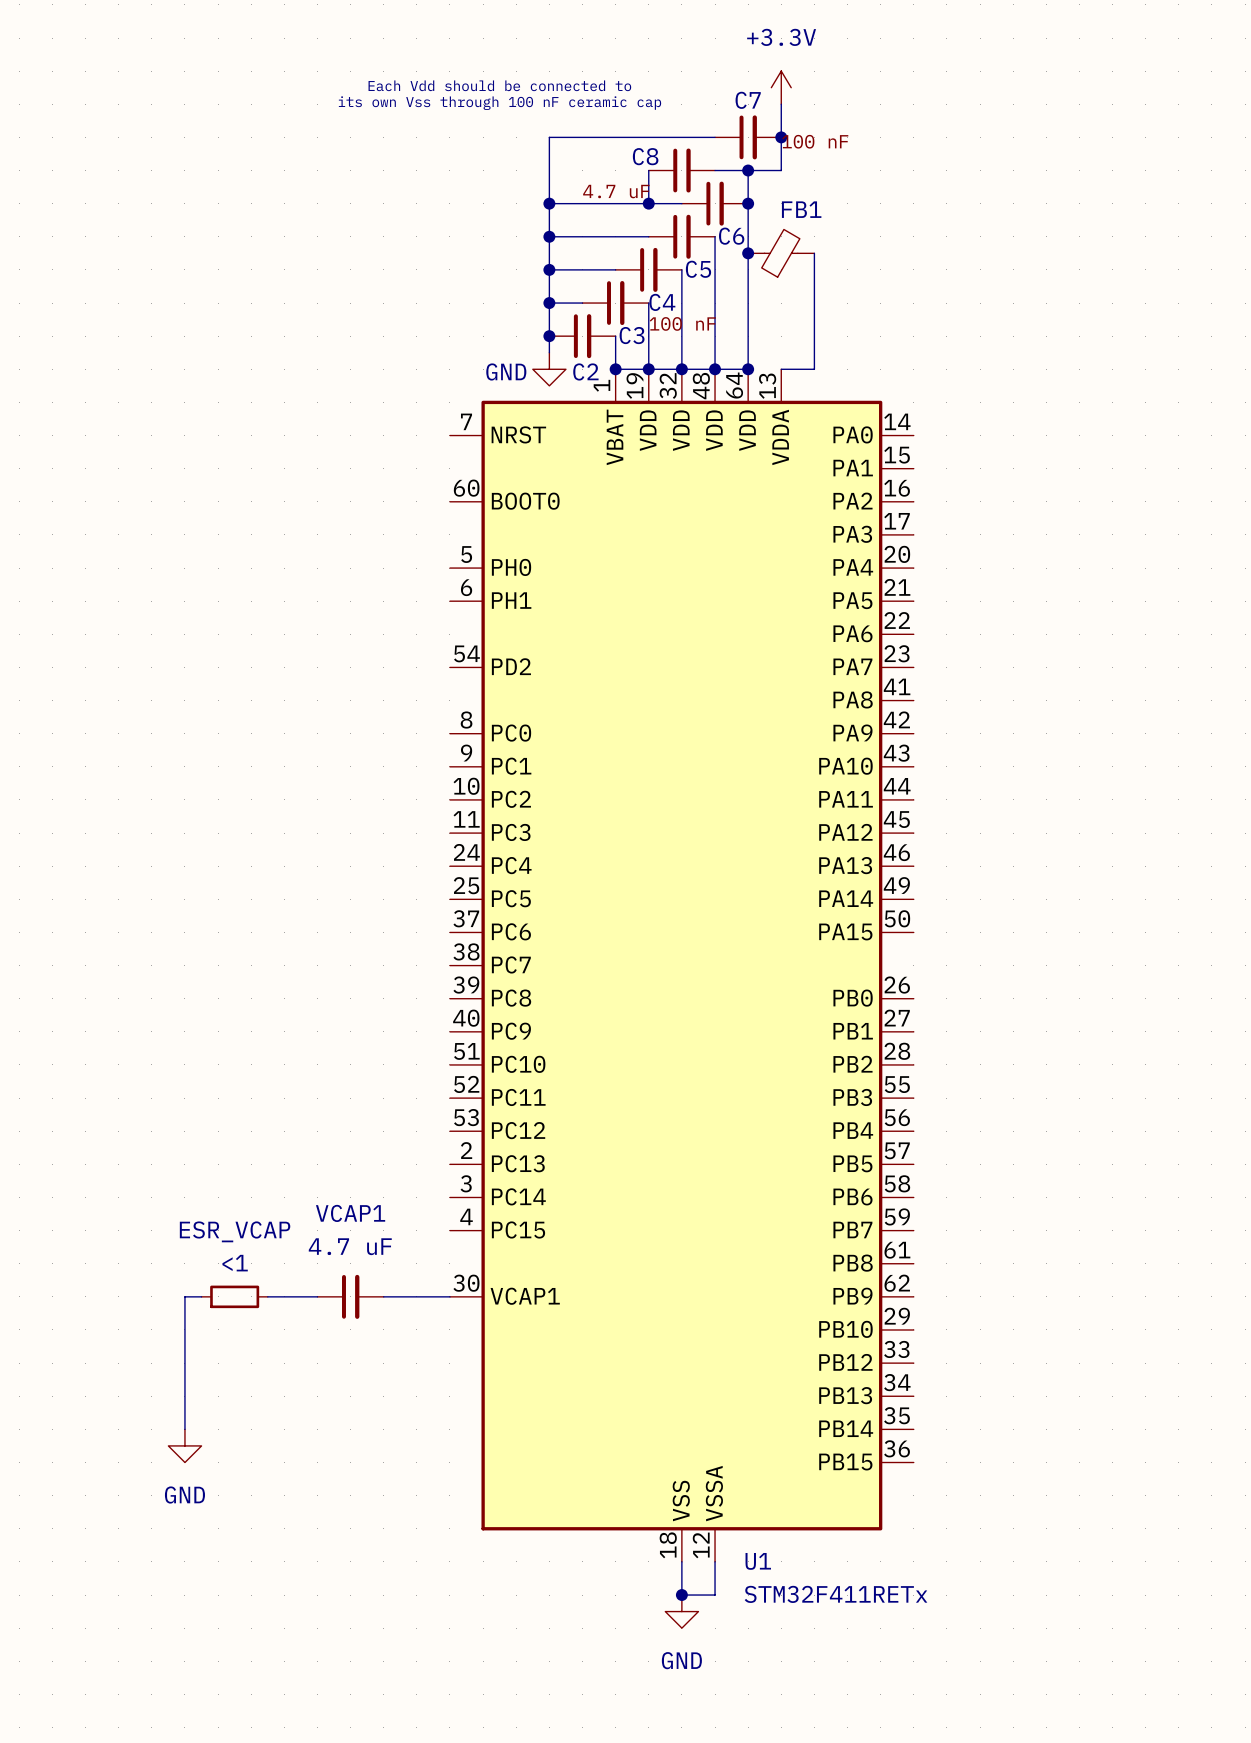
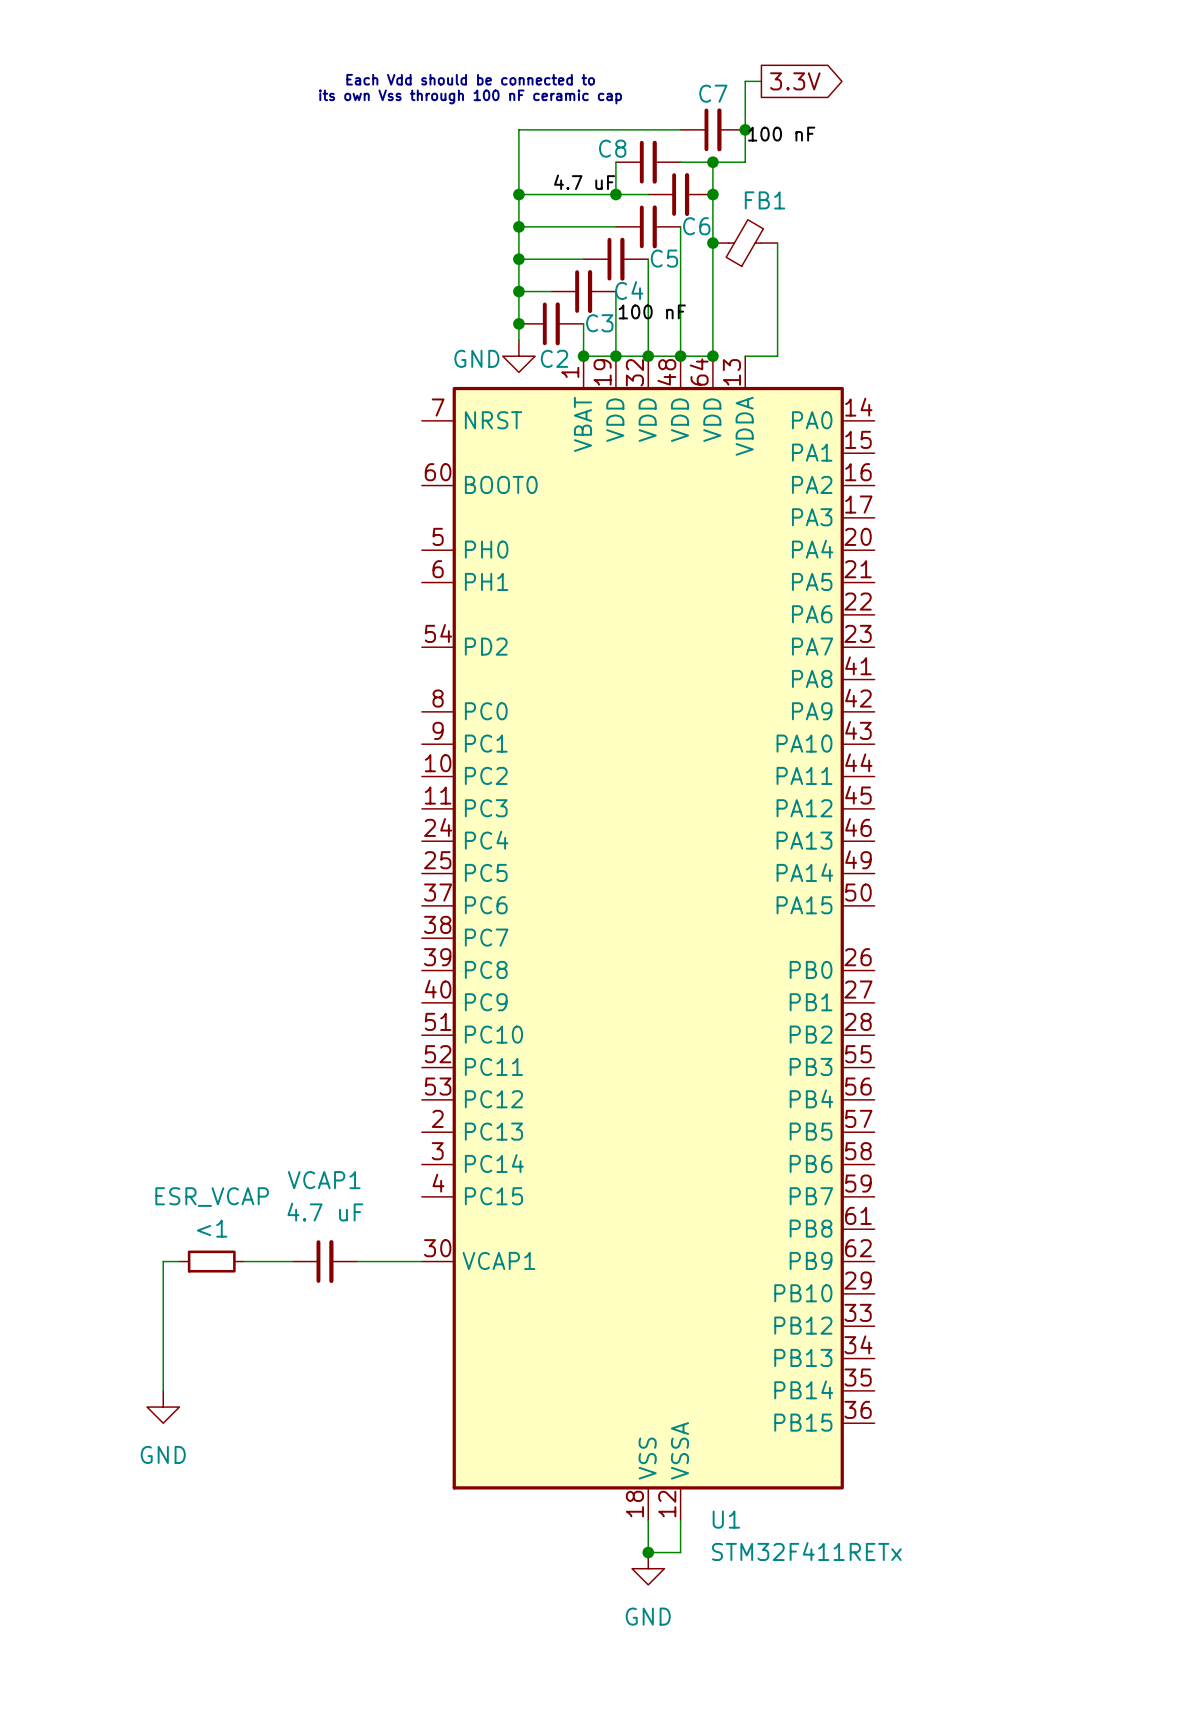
power symbol: +3.3V (781, 87) -> none
global label: none -> 3.3V (795, 81)

